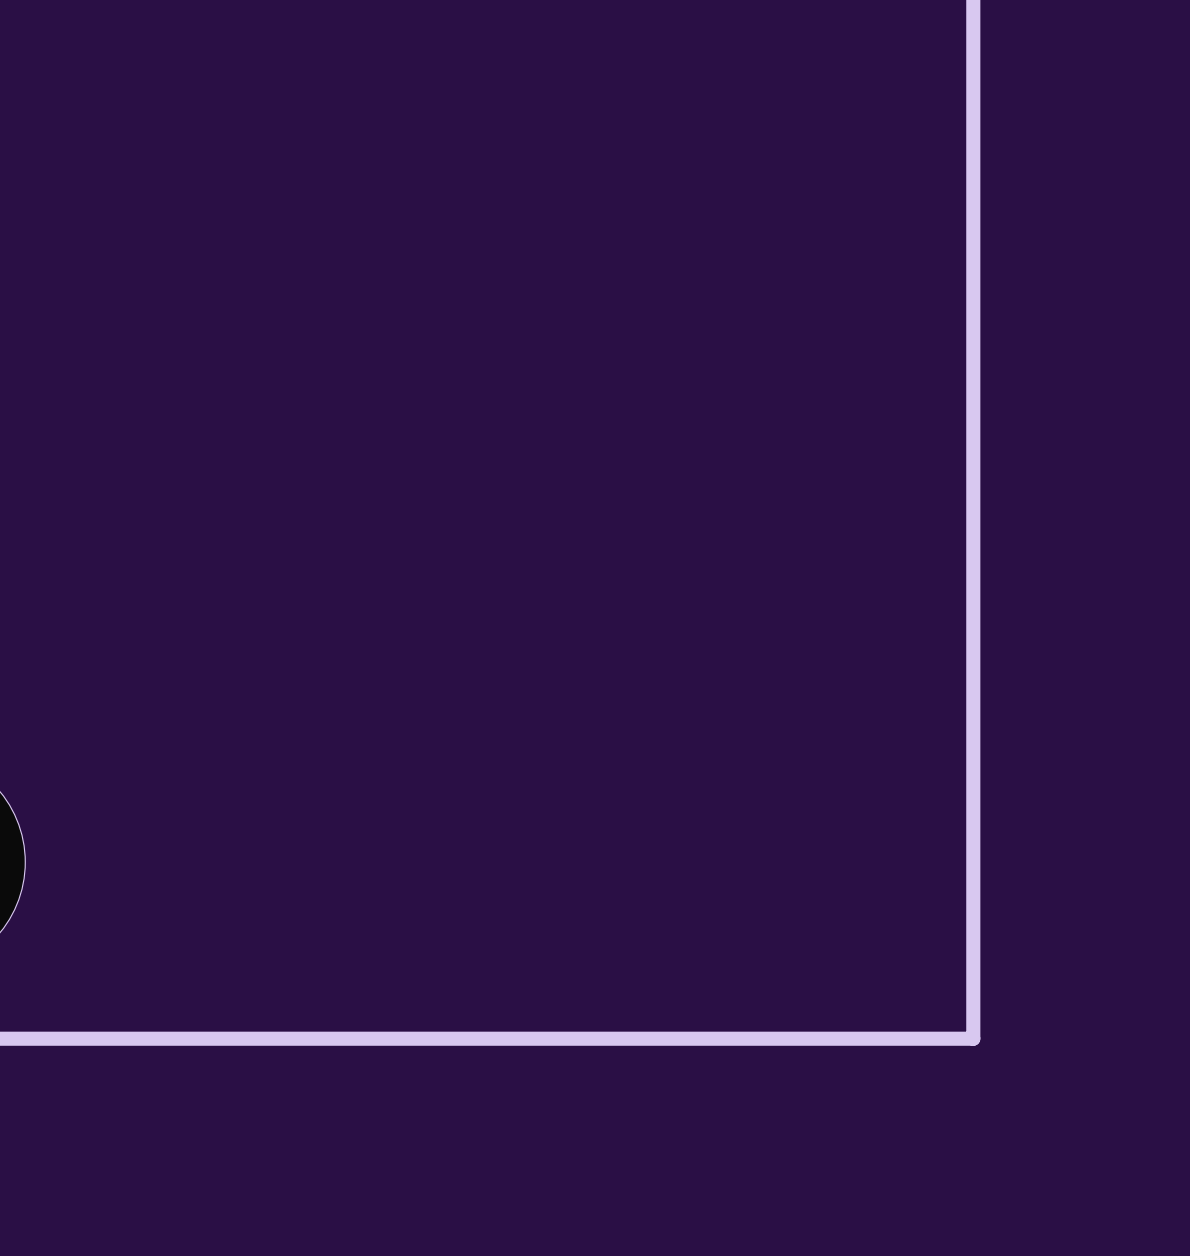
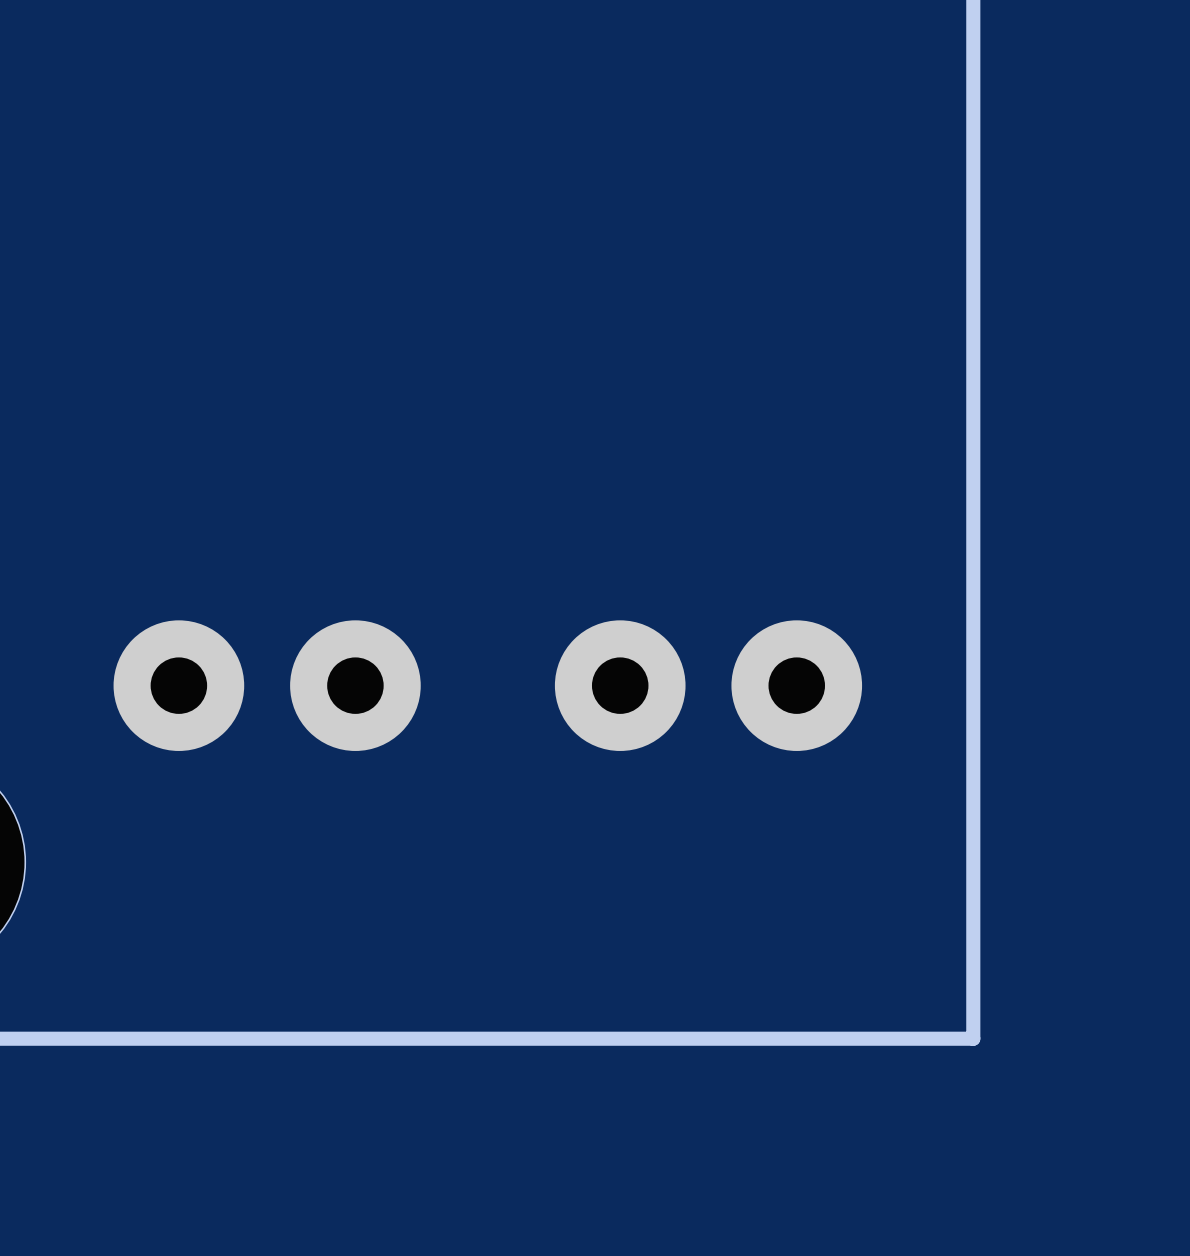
part: none -> (267, 685)
part: none -> (708, 685)

